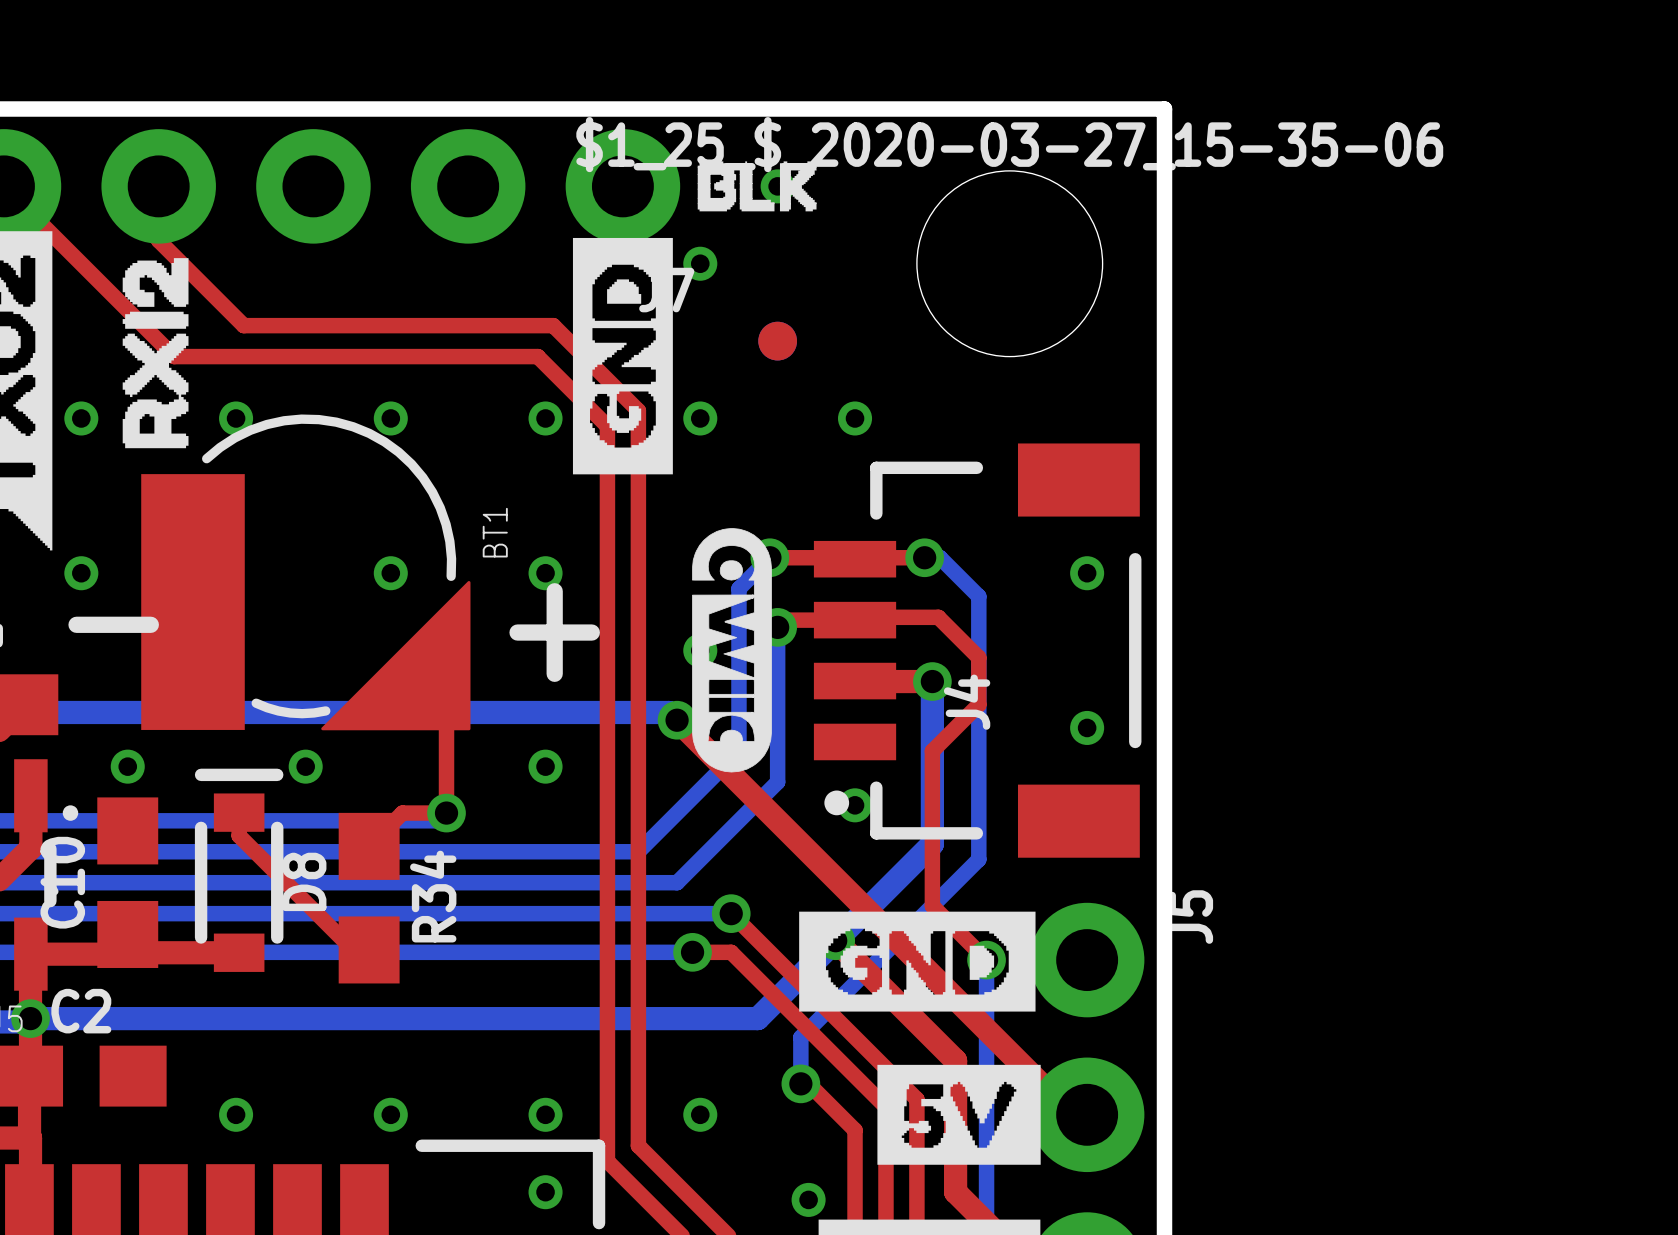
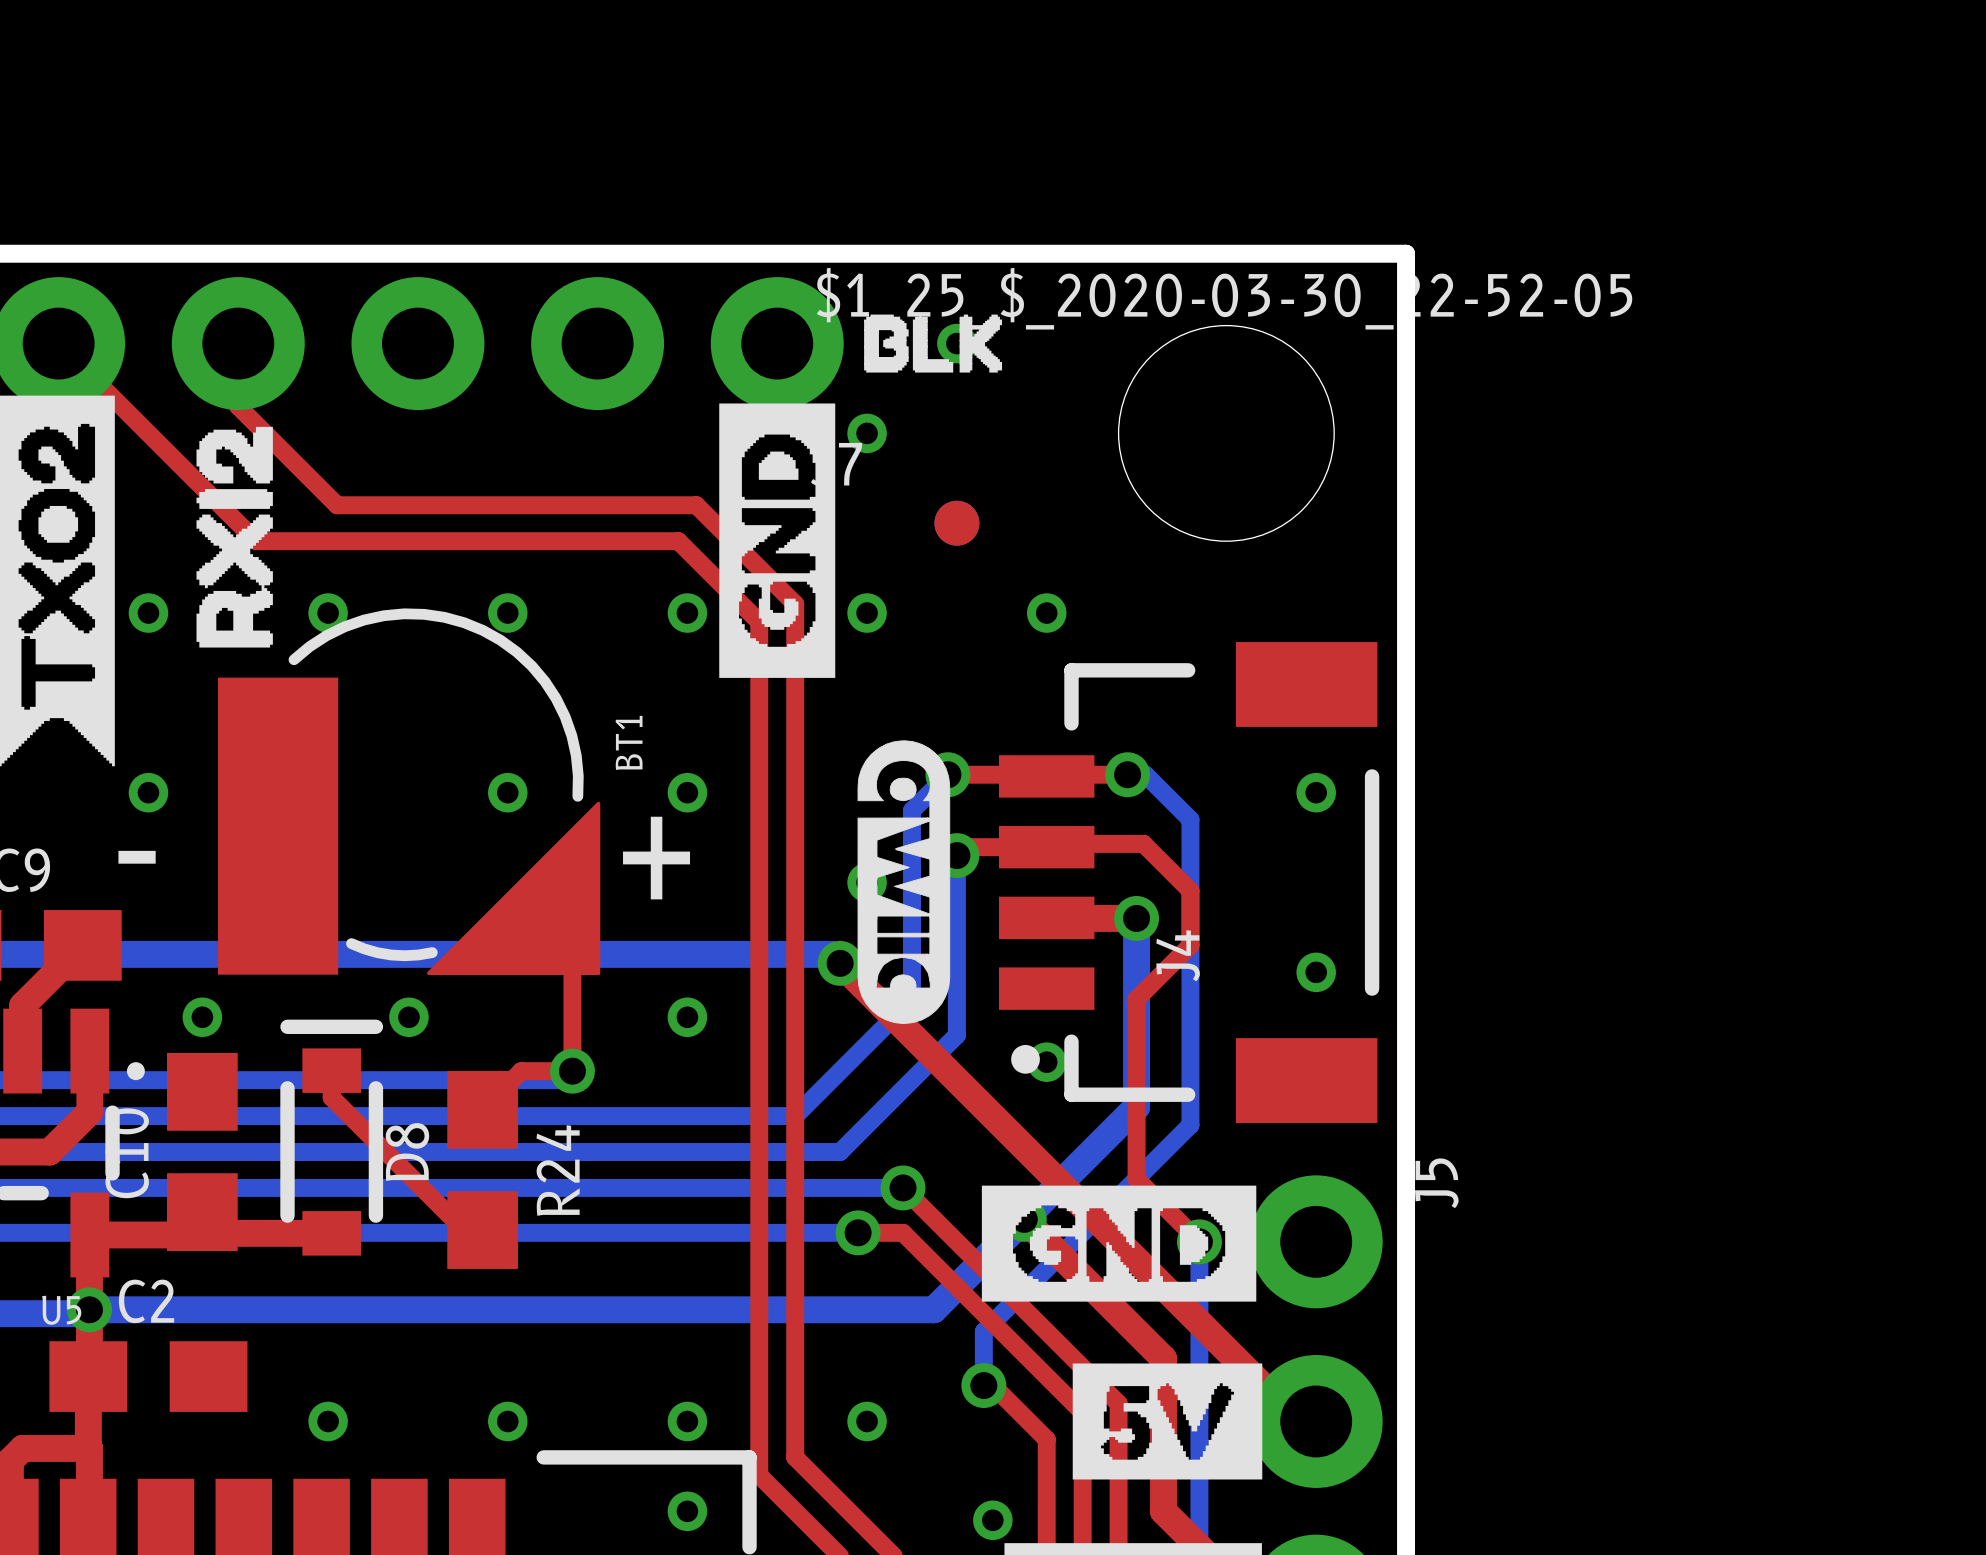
$1_25_$_2020-03-27_15-35-06 name: $1_25_$_2020-03-27_15-35-06 (1009, 144) -> $1_25_$_2020-03-30_22-52-05 (1224, 298)
R34 name: R34 (433, 896) -> R24 (558, 1170)

